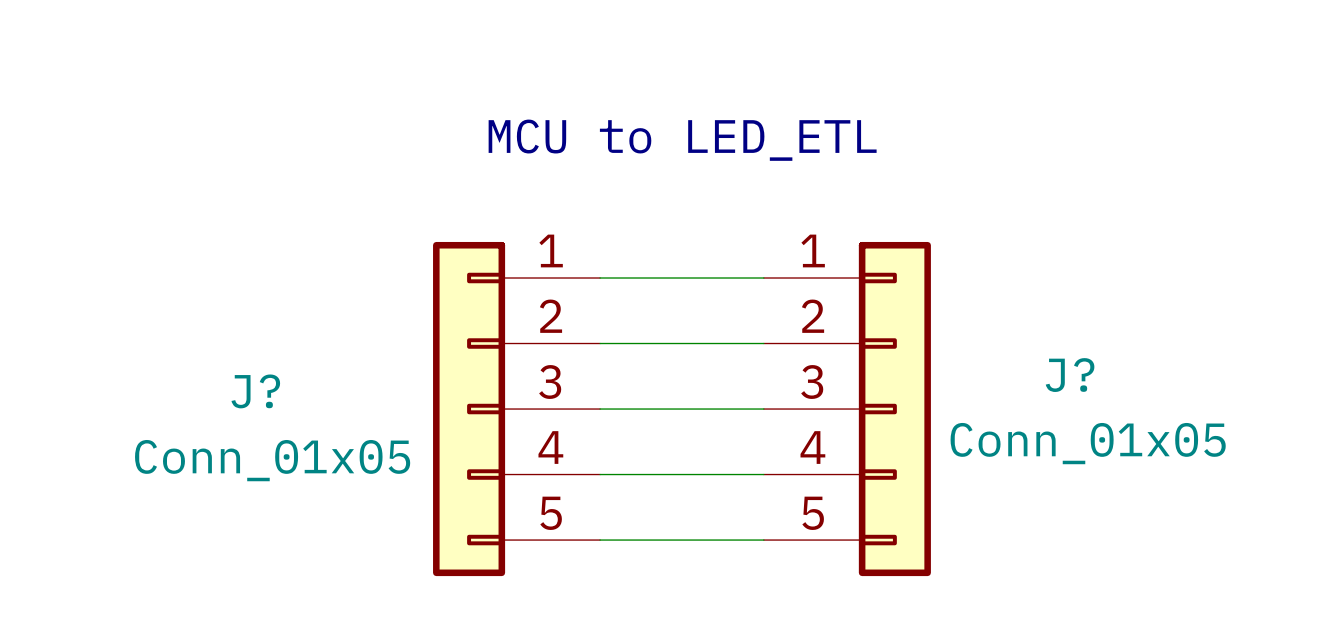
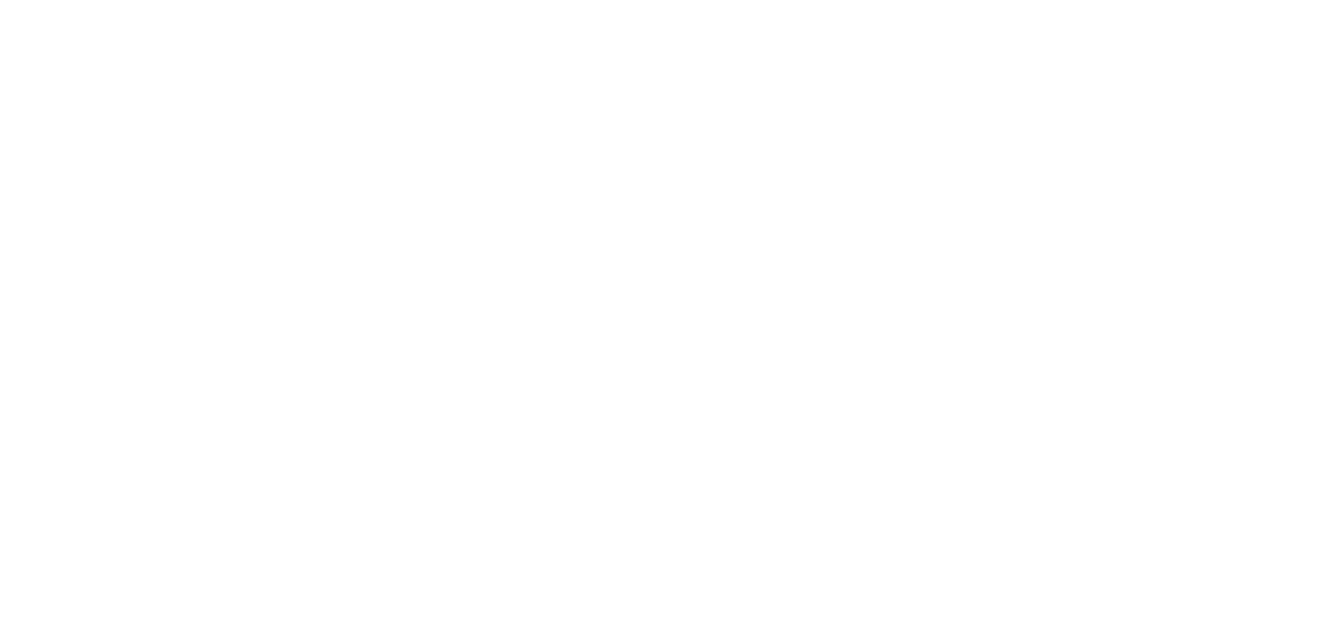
text: MCU to LED_ETL (682, 140) -> none
wire: (600, 278) (763, 278) -> none
wire: (600, 343) (763, 343) -> none
J?: Conn_01x05 (516, 409) -> none
wire: (600, 409) (763, 409) -> none
J?: Conn_01x05 (847, 409) -> none
wire: (600, 474) (763, 474) -> none
wire: (600, 540) (763, 540) -> none

